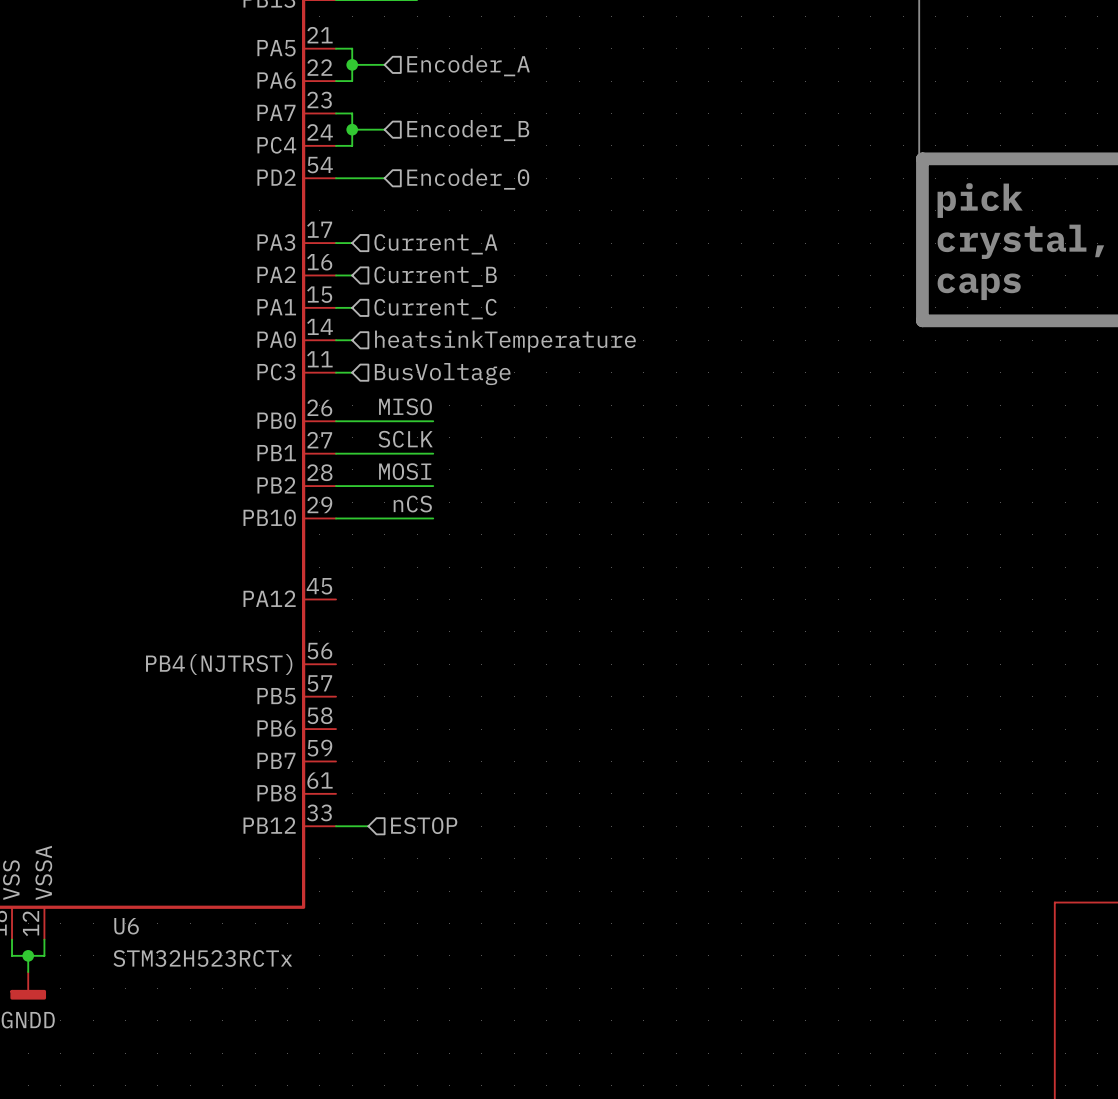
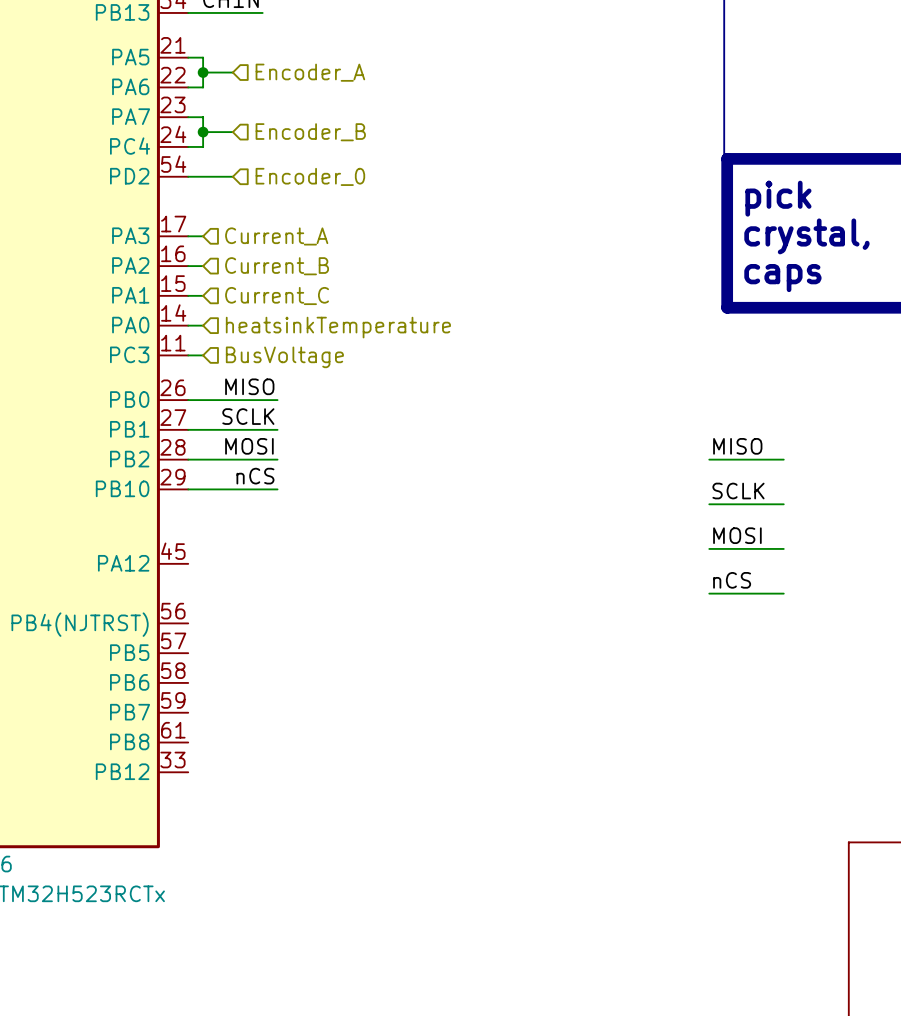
label: none -> MISO (737, 446)
wire: none -> (709, 459) (783, 459)
label: none -> SCLK (738, 491)
wire: none -> (709, 504) (783, 504)
label: none -> MOSI (737, 535)
wire: none -> (709, 548) (783, 548)
label: none -> nCS (732, 580)
wire: none -> (709, 593) (783, 593)
hierarchical label: ESTOP (424, 825) -> none
wire: (336, 826) (368, 826) -> none

